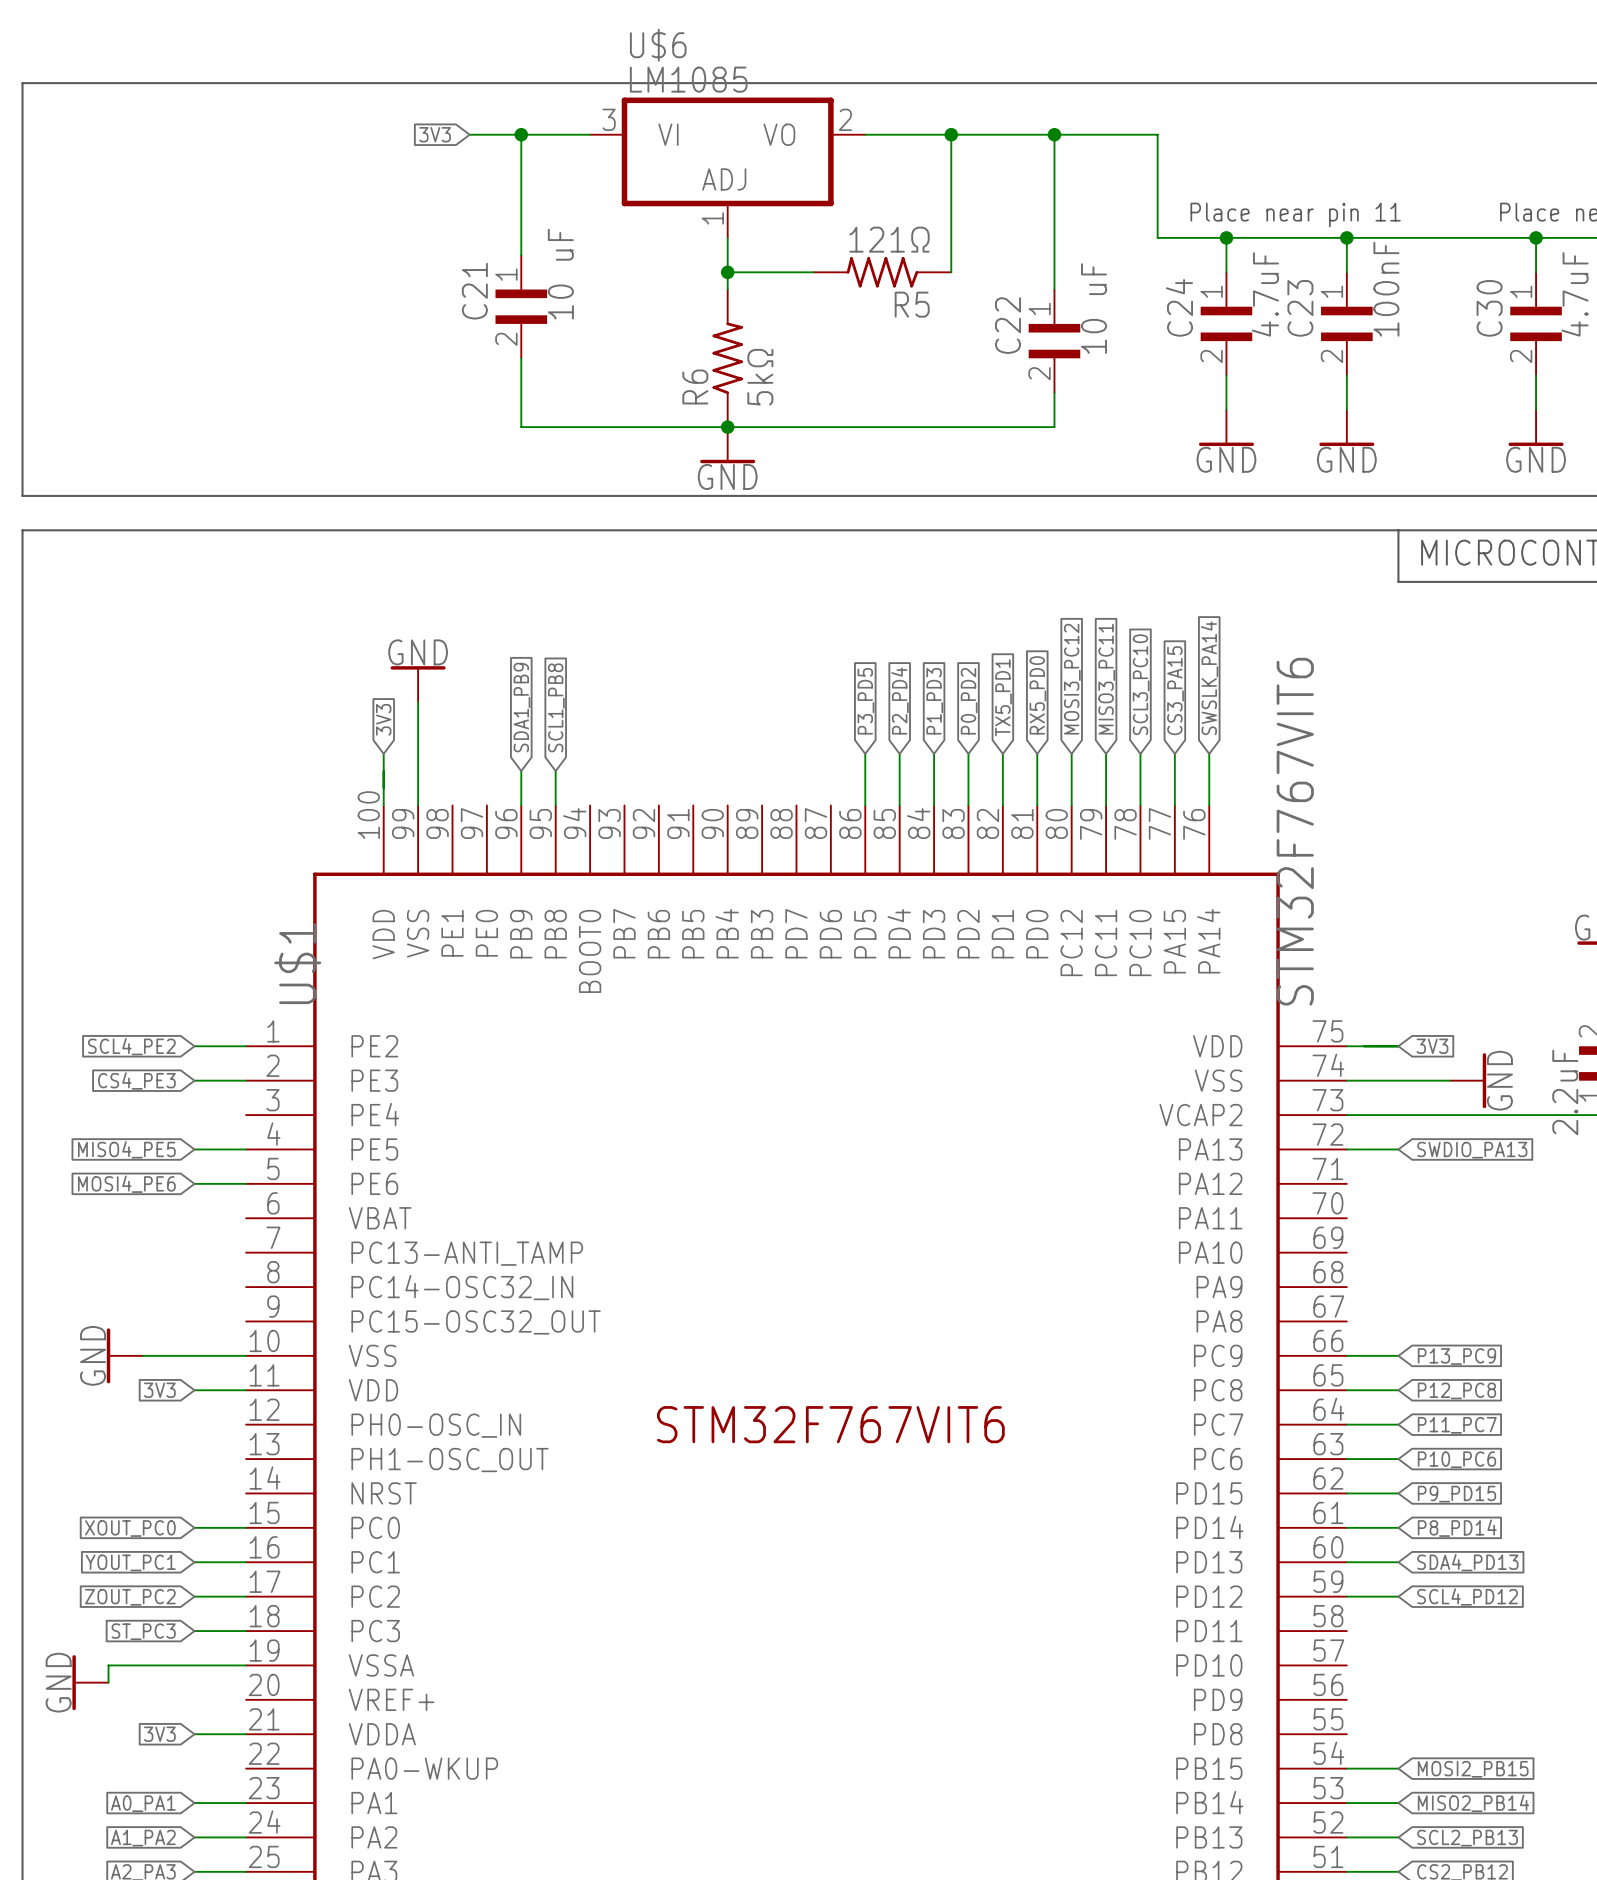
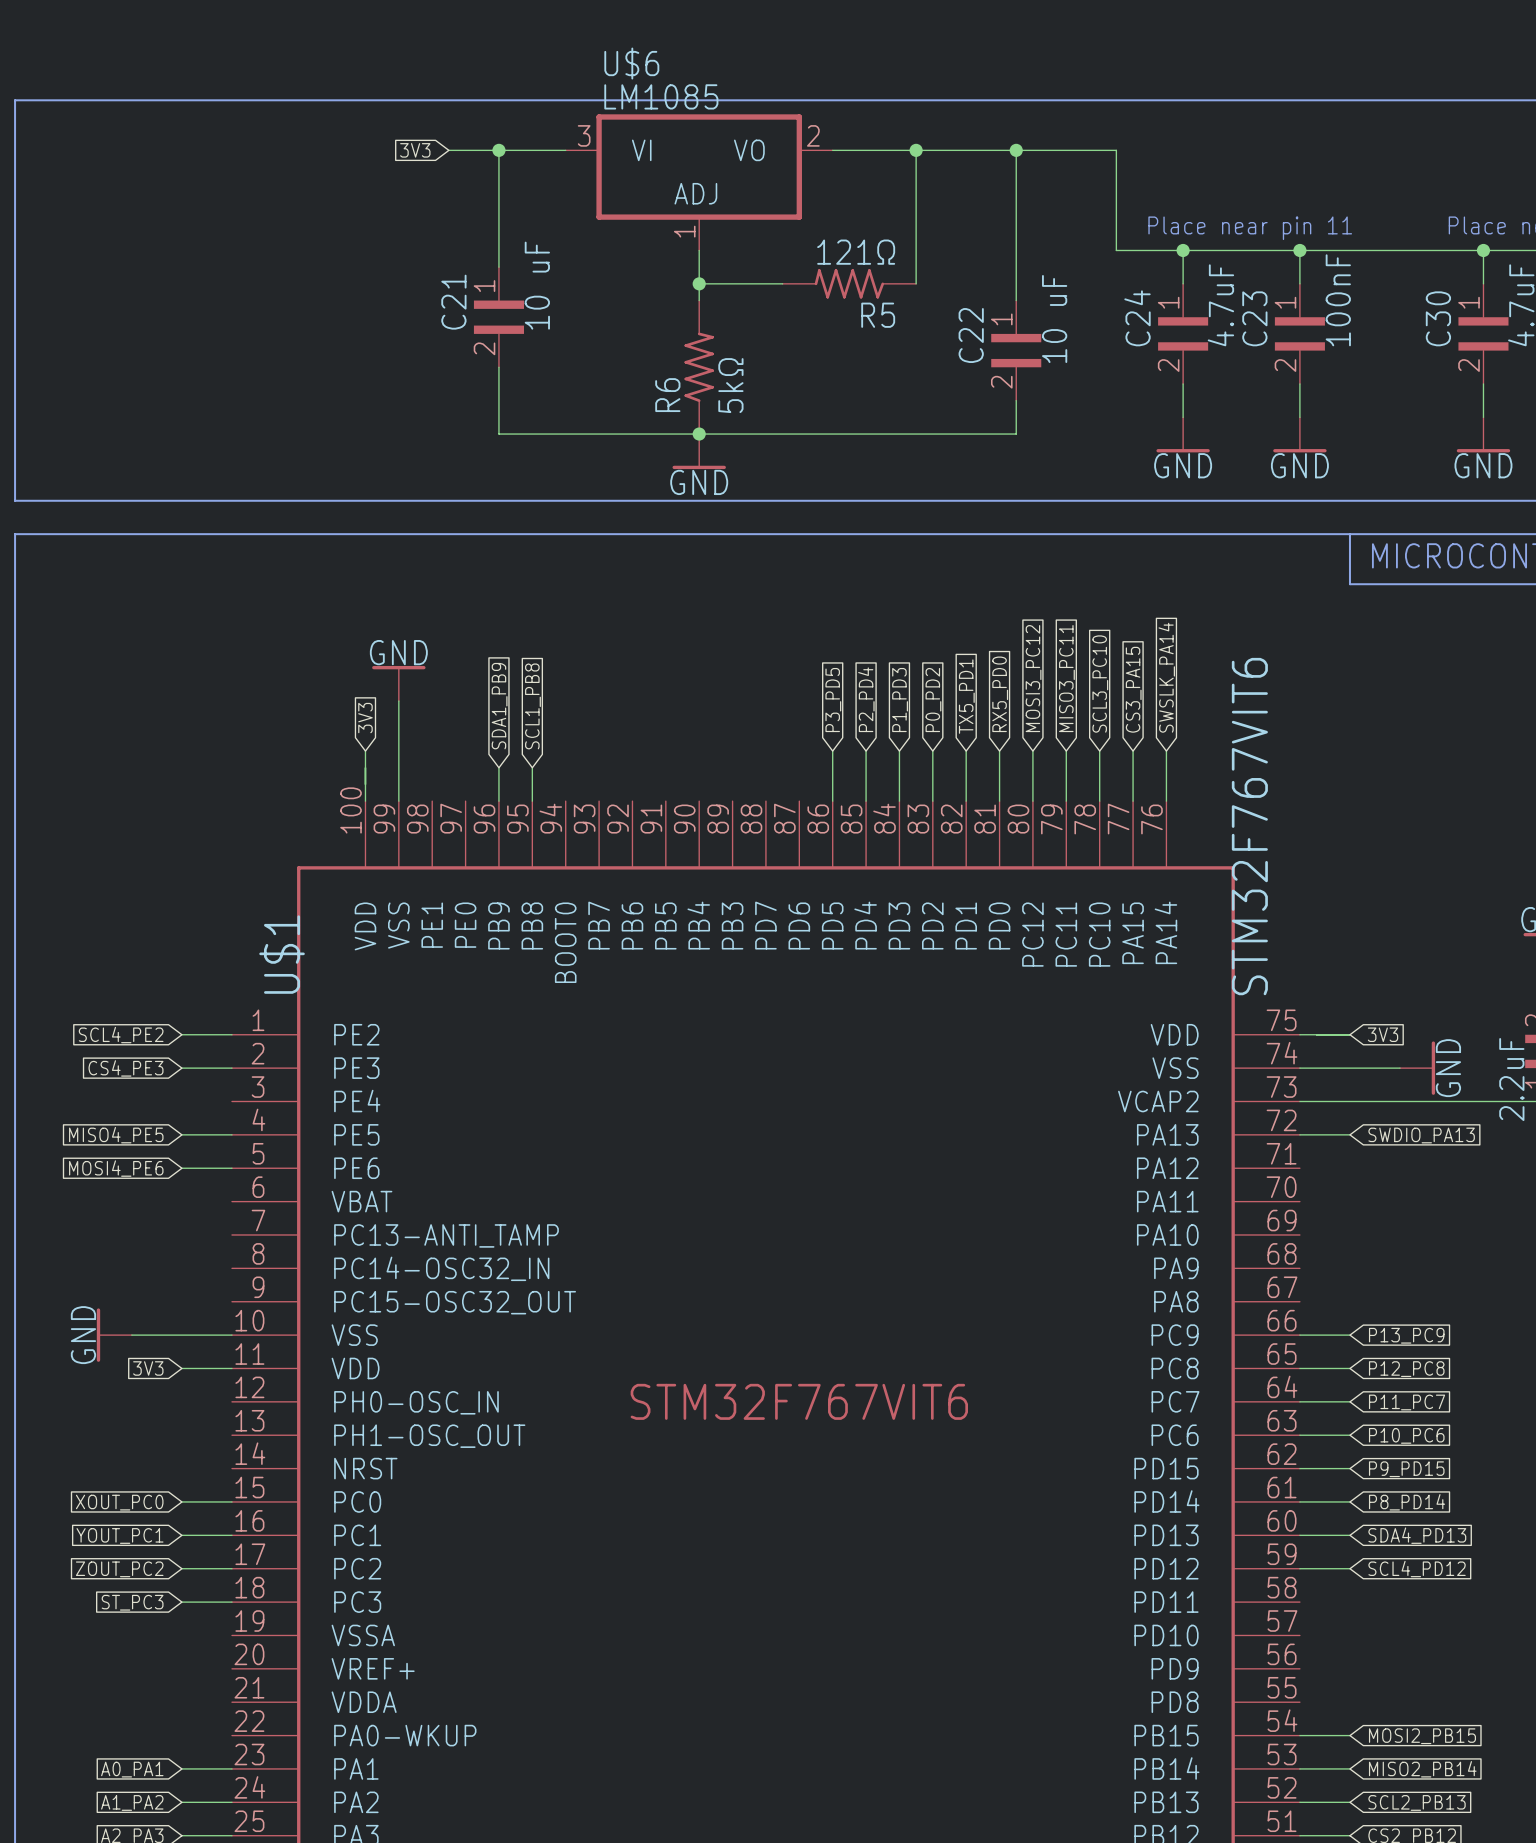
wire: (246, 1665) (108, 1665) (108, 1682) -> none
power symbol: GND (90, 1682) -> none
global label: 3V3 (159, 1734) -> none
wire: (194, 1734) (246, 1734) -> none

